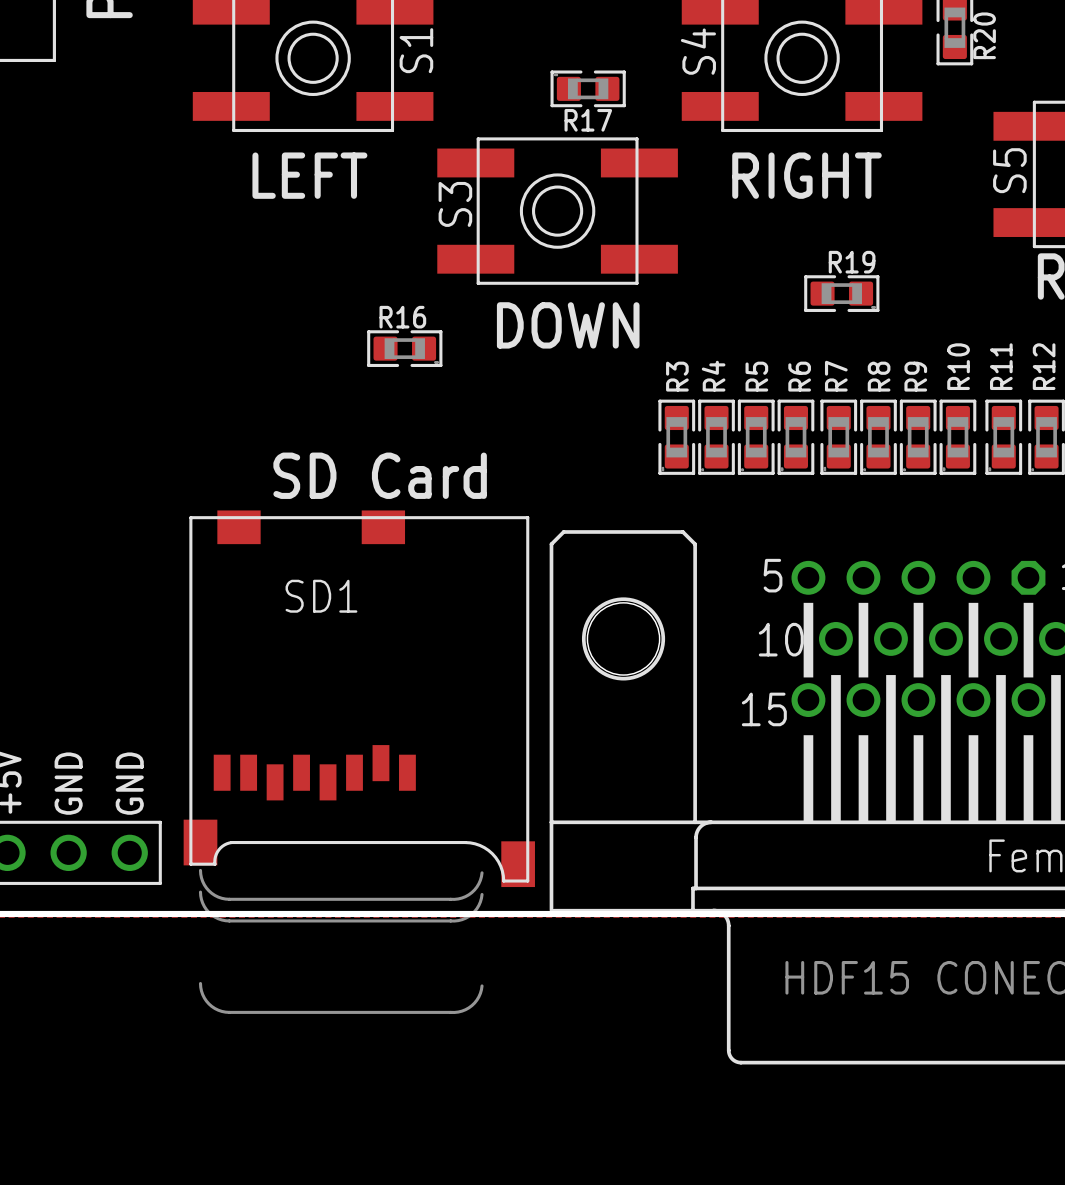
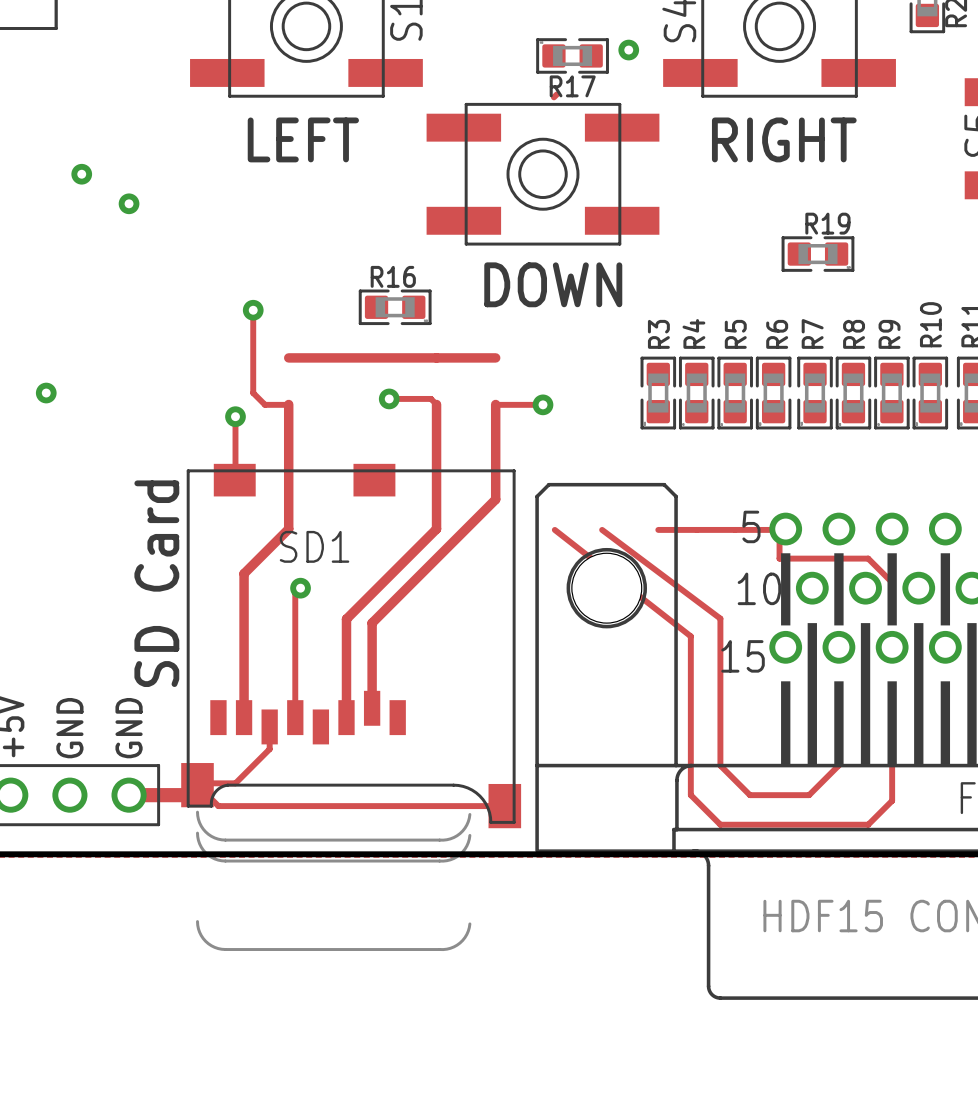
via: none -> (628, 50)
track: none -> (556, 94) (553, 97)
S3 name: S3 (455, 204) -> none
via: none -> (81, 174)
via: none -> (129, 203)
track: none -> (253, 310) (253, 393) (265, 404) (288, 404) (288, 529) (244, 573) (244, 717)
via: none -> (253, 310)
track: none -> (288, 357) (495, 357)
via: none -> (46, 393)
track: none -> (389, 398) (431, 398) (436, 404) (436, 529) (346, 619) (346, 717)
via: none -> (389, 398)
track: none -> (542, 404) (495, 404) (495, 499) (372, 623) (372, 708)
via: none -> (542, 404)
track: none -> (235, 416) (234, 480)
via: none -> (235, 416)
text rotation: 0° (380, 475) -> 90° counterclockwise (156, 583)
track: none -> (554, 529) (690, 636) (690, 795) (720, 824) (868, 824) (892, 800) (892, 736)
track: none -> (602, 529) (720, 618) (720, 765) (749, 795) (809, 795) (838, 765) (838, 736)
track: none -> (658, 529) (773, 529) (779, 535) (779, 558) (868, 558) (892, 582) (892, 617)
track: none -> (300, 588) (295, 593) (295, 717)
via: none -> (300, 588)
track: none -> (269, 726) (269, 749) (235, 783) (199, 783) (187, 795) (129, 795)
track: none -> (197, 785) (218, 806) (504, 806)

